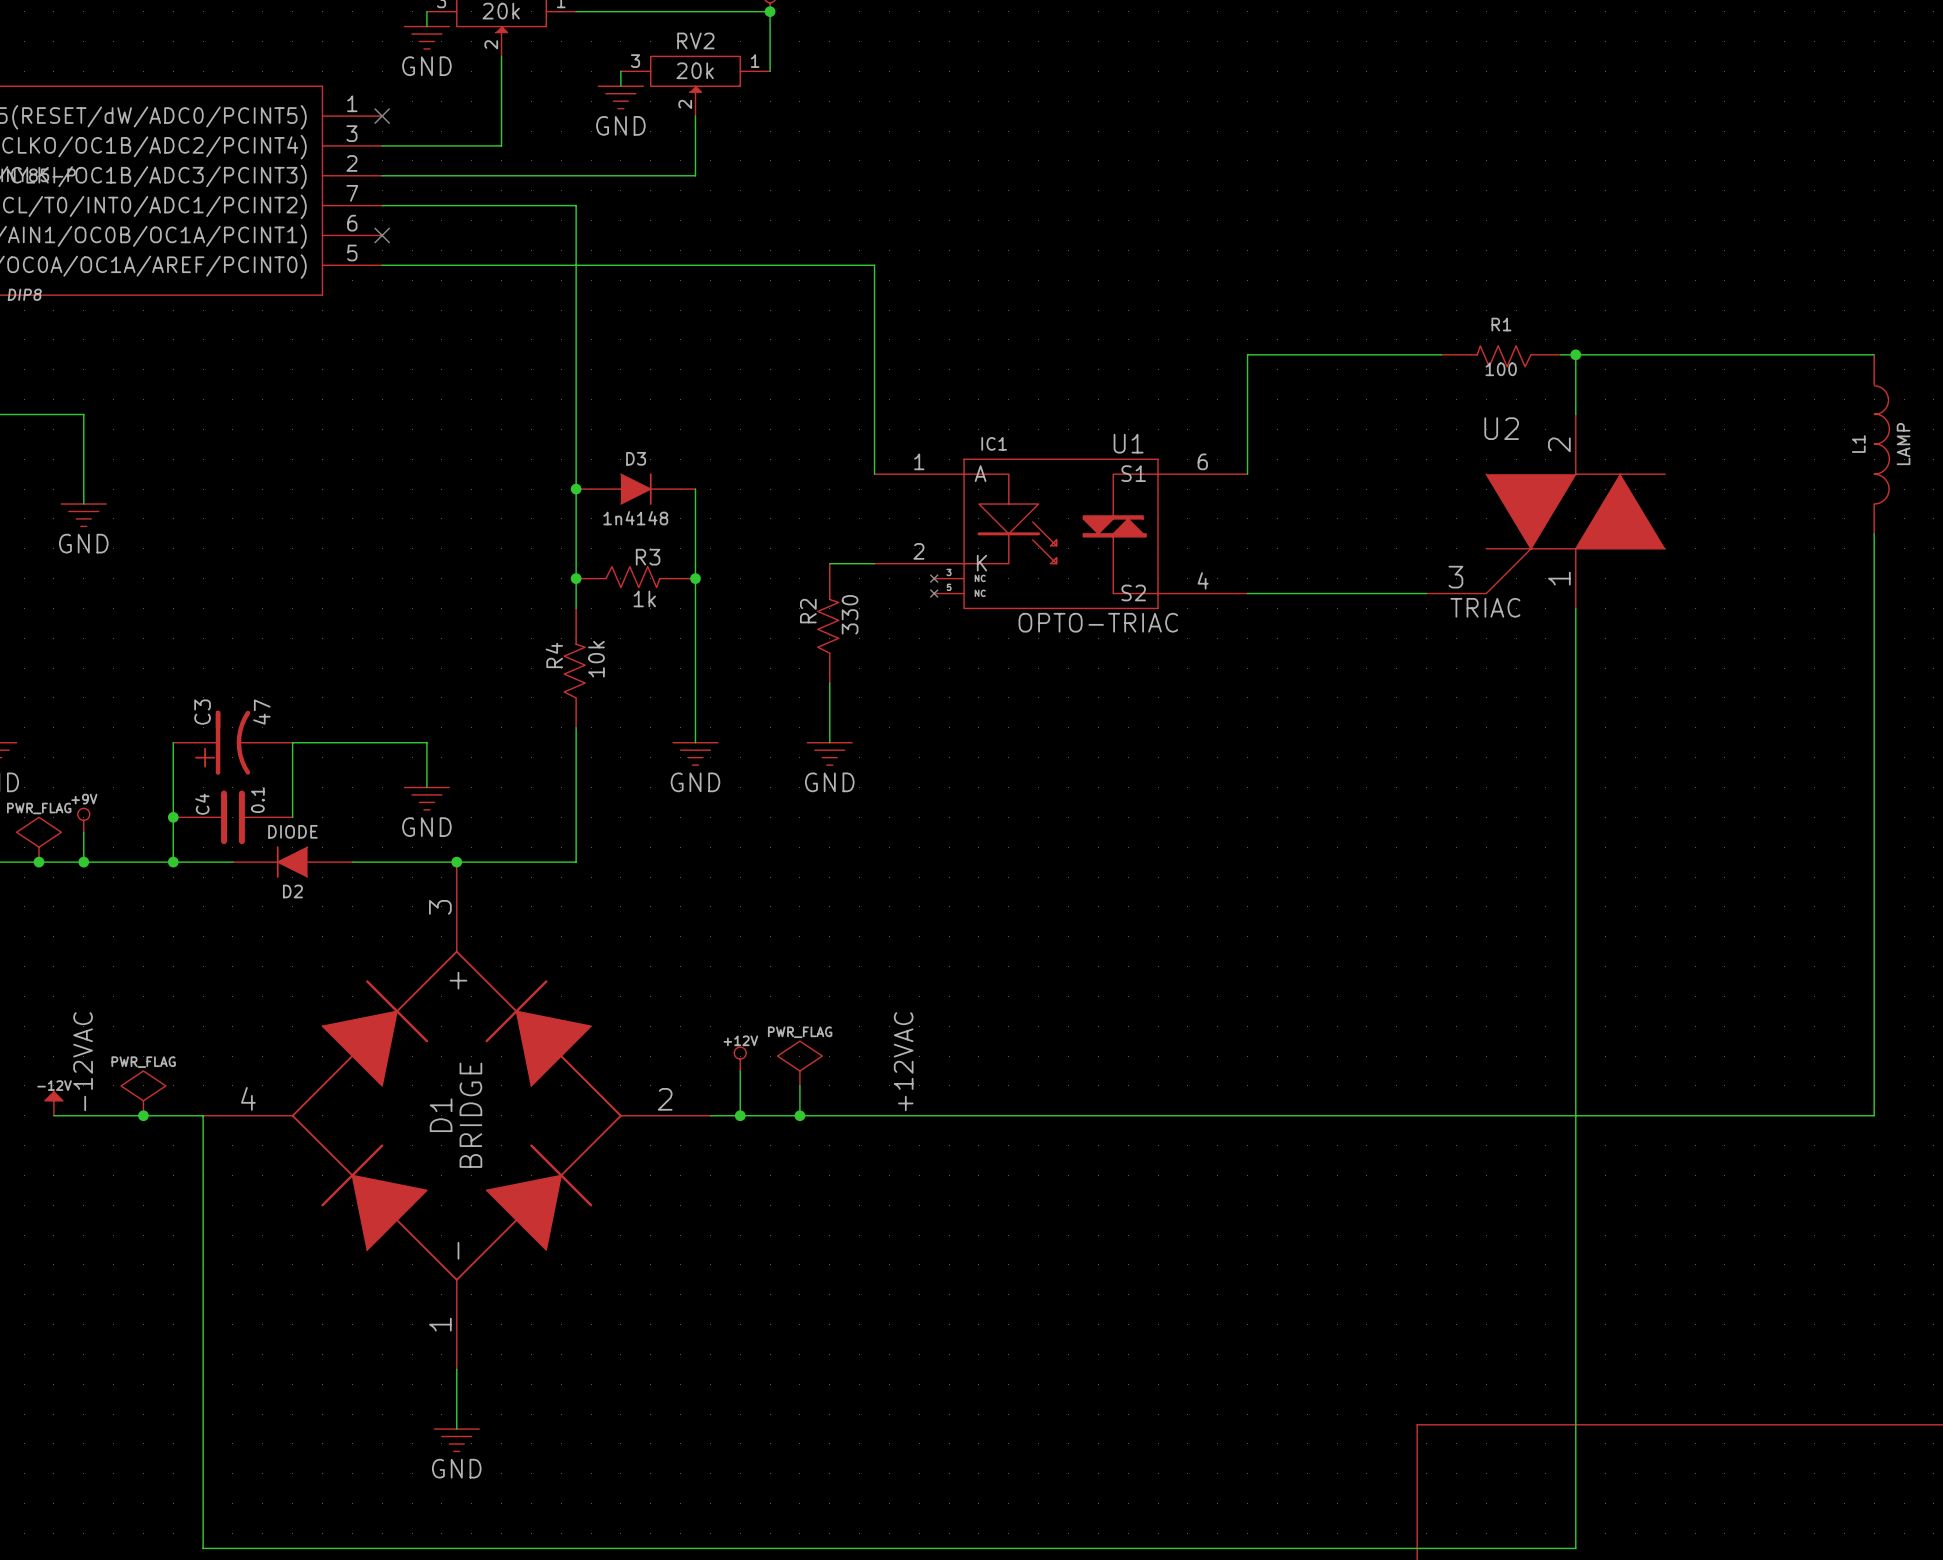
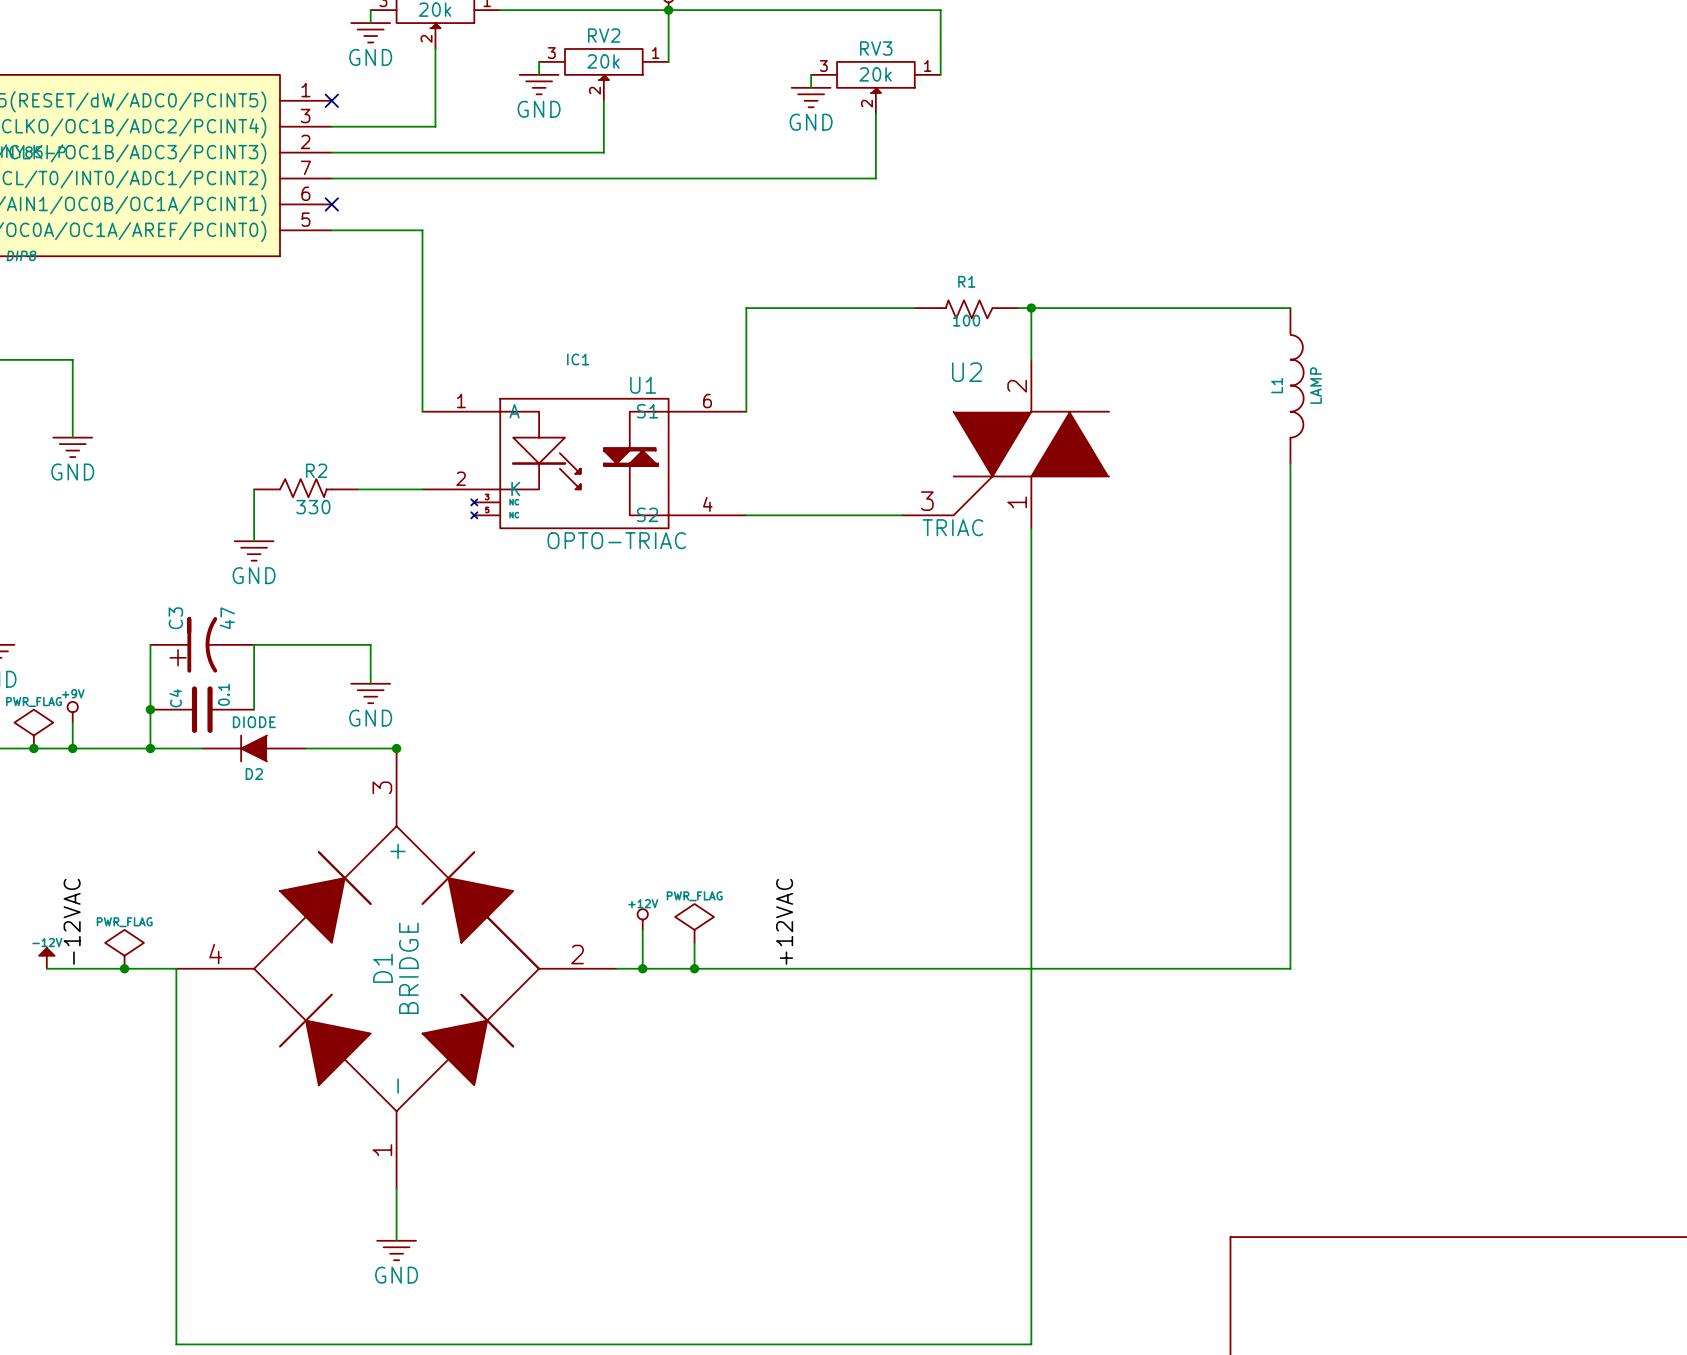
wire: none -> (668, 10) (940, 10) (940, 74)
wire: none -> (811, 74) (811, 87)
RV3: none -> 20k (875, 87)
power symbol: none -> GND (811, 97)
wire: (576, 205) (576, 608) -> (500, 178) (875, 178) (875, 113)
wire: (486, 265) (874, 265) (874, 474) -> (422, 230) (422, 411)
wire: none -> (914, 308) (746, 308) (746, 411)
wire: none -> (1031, 308) (1031, 359)
junction: none -> (1031, 308)
wire: (1247, 354) (1247, 474) -> (1083, 308) (1018, 308)
wire: (1560, 354) (1874, 354) -> none
wire: (1575, 354) (1575, 414) -> none
junction: (1575, 354) -> none
R1 position: (1501, 356) -> (966, 309)
IC1 name position: IC1 (994, 443) -> IC1 (578, 359)
L1 position: (1881, 444) -> (1297, 385)
junction: (576, 489) -> none
D3: 1n4148 (635, 489) -> none
wire: (695, 489) (695, 742) -> none
U2 position: (1545, 511) -> (1005, 444)
U1 position: (1061, 533) -> (584, 463)
wire: (1874, 533) (1874, 1115) (1486, 1115) -> (1290, 463) (1290, 968)
wire: none -> (254, 489) (254, 541)
wire: none -> (357, 489) (422, 489)
wire: (829, 563) (874, 563) -> none
R3: 1k (635, 577) -> none
junction: (576, 578) -> none
junction: (695, 578) -> none
wire: none -> (746, 515) (901, 515)
wire: (1247, 593) (1426, 593) -> none
wire: (1575, 608) (1575, 1548) (1187, 1548) -> (1031, 528) (1031, 1344)
R2 rotation: 0° (828, 623) -> 90° clockwise (305, 488)
R2 position: (828, 623) -> (305, 488)
power symbol: none -> GND (254, 550)
R4: 10k (574, 668) -> none
wire: (829, 683) (829, 742) -> none
wire: (576, 727) (576, 862) (456, 862) -> none
power symbol: GND (695, 753) -> none
power symbol: GND (829, 753) -> none

